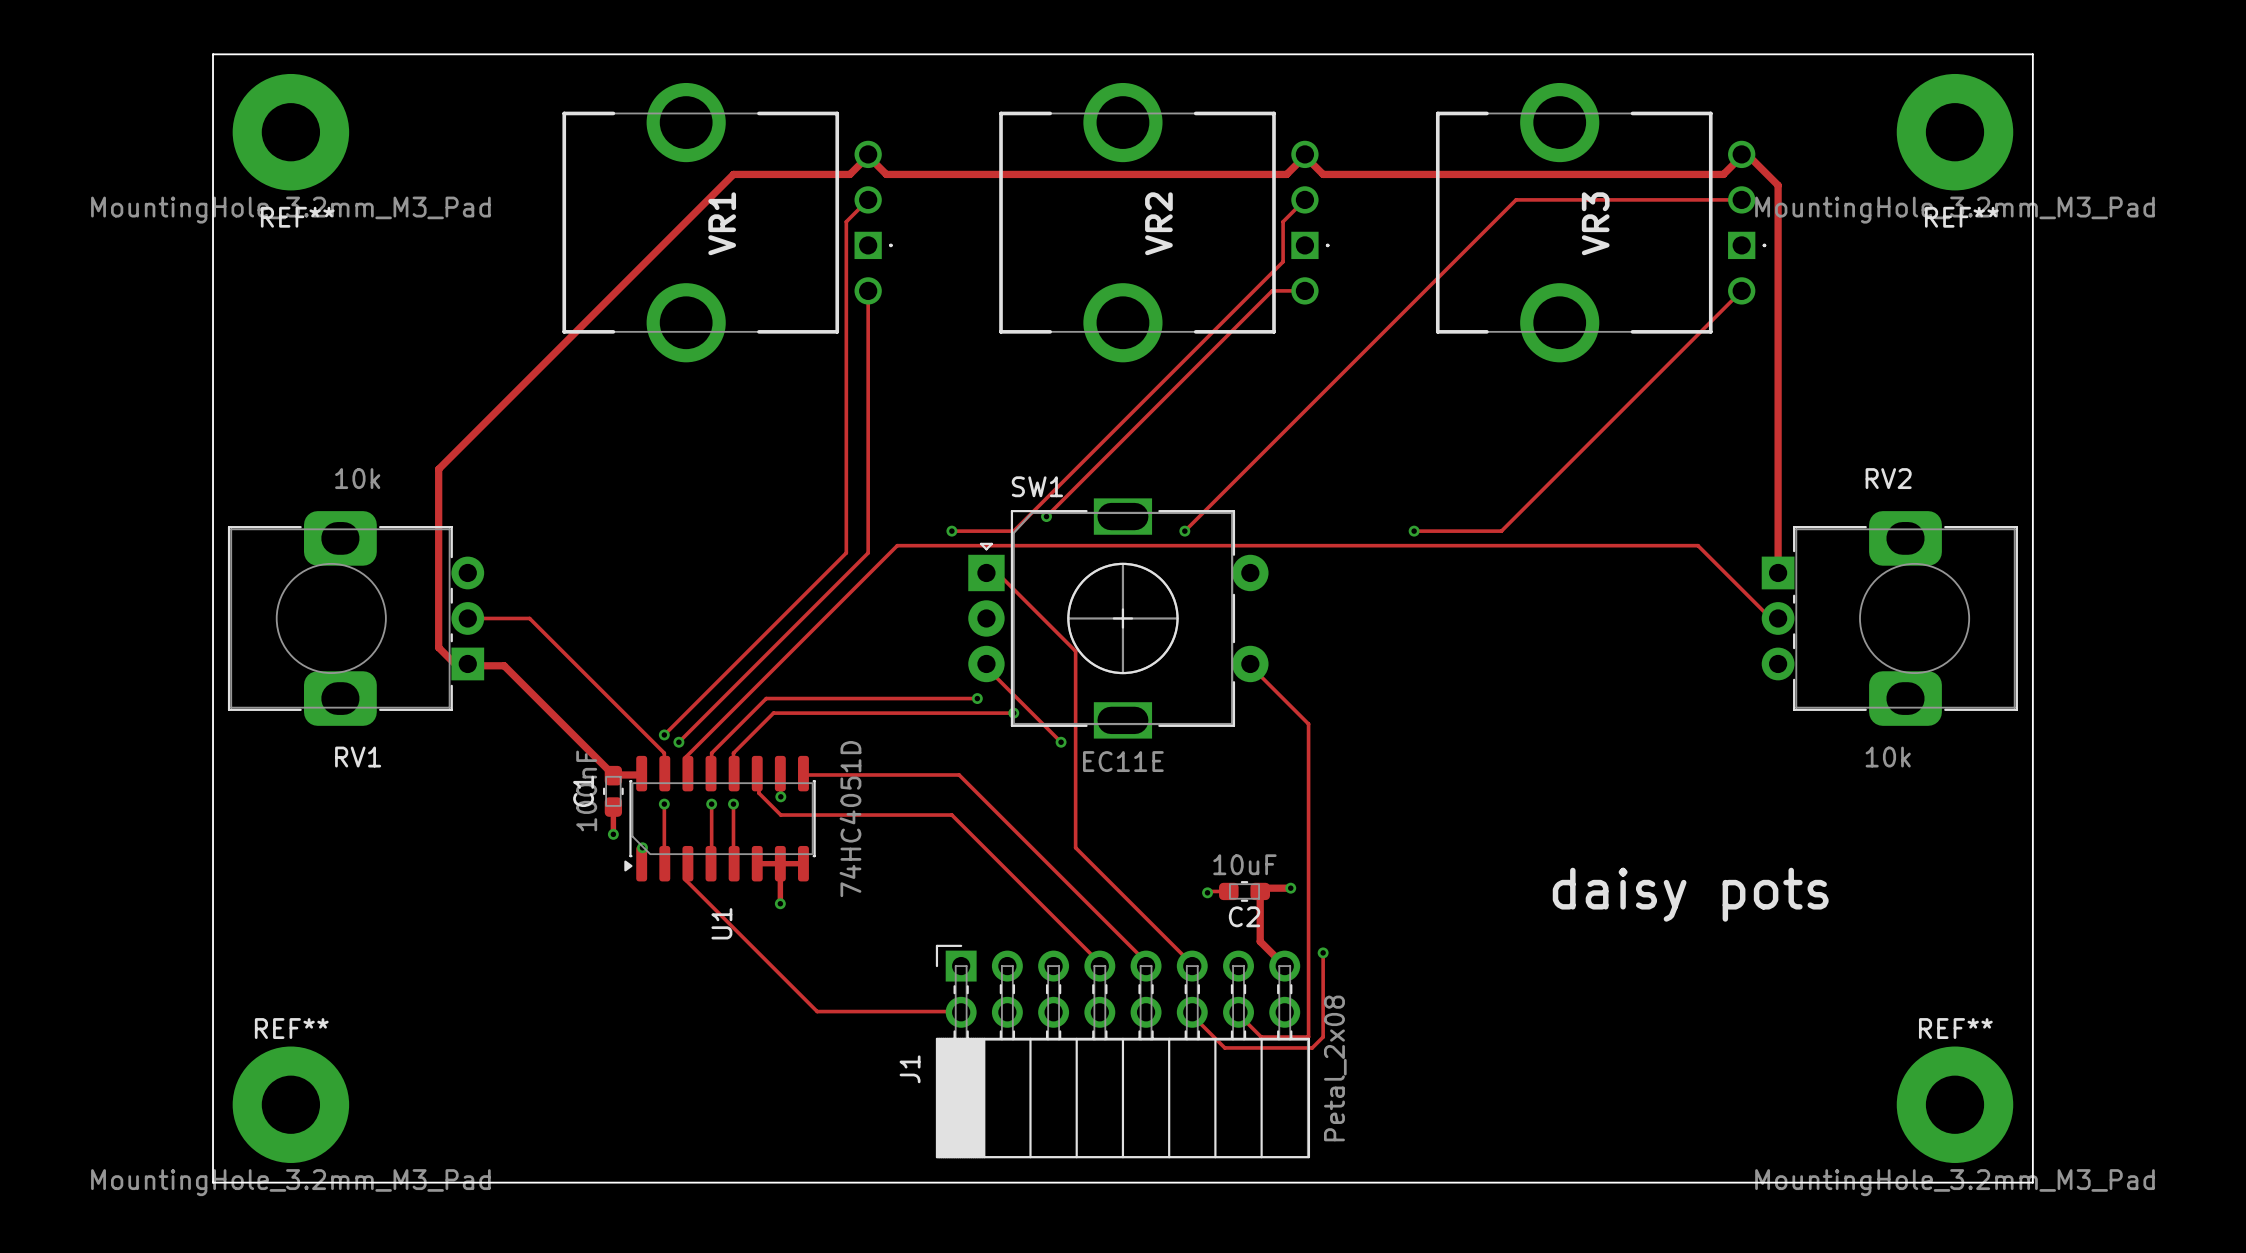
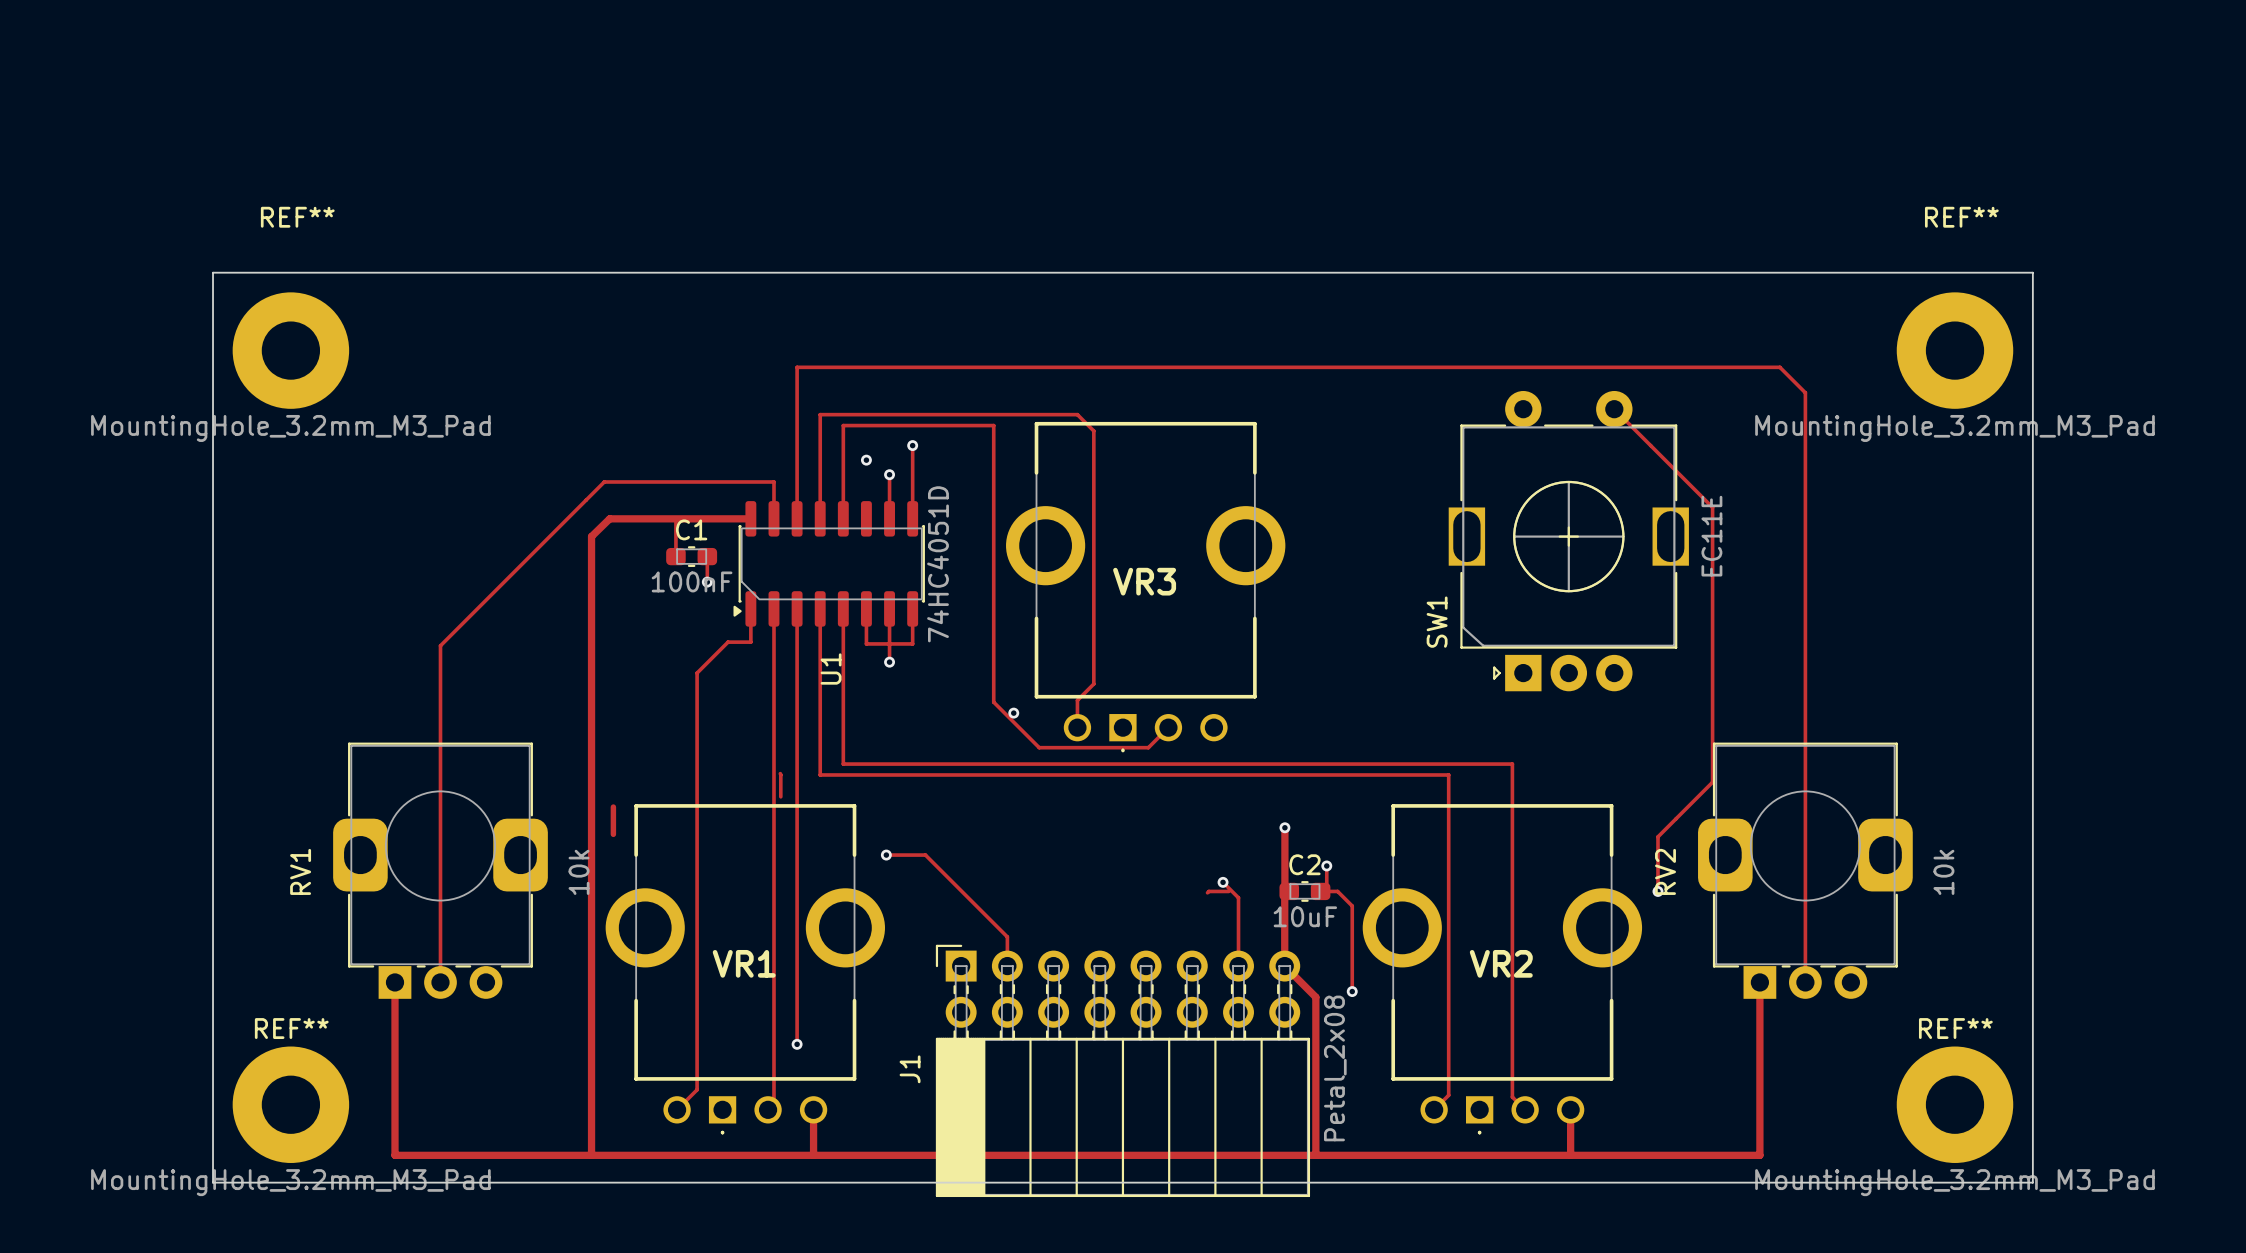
REF** position: (290, 132) -> (290, 350)
REF** position: (1954, 132) -> (1954, 350)
track: (868, 156) (886, 174) (1286, 174) (1304, 156) -> none
track: (868, 156) (849, 174) (733, 174) (438, 469) (438, 647) (456, 665) (504, 665) (613, 774) -> none
track: (1304, 156) (1323, 174) (1723, 174) (1741, 156) -> none
track: (1741, 156) (1748, 156) (1778, 185) (1778, 572) -> none
track: (868, 199) (846, 221) (846, 552) (664, 734) -> none
track: (1304, 199) (1283, 221) (1283, 261) (1013, 531) (951, 531) -> none
track: (1741, 199) (1516, 199) (1184, 531) -> none
VR1 rotation: 0° (727, 222) -> 90° clockwise (745, 969)
VR1 position: (727, 222) -> (745, 969)
VR2 rotation: 0° (1164, 222) -> 90° clockwise (1502, 969)
VR2 position: (1164, 222) -> (1502, 969)
VR3 rotation: 0° (1601, 222) -> 90° clockwise (1145, 587)
VR3 position: (1601, 222) -> (1145, 587)
board edge: (213, 272) (213, 54) (2032, 54) (2032, 272) -> (213, 272) (2032, 272)
track: (868, 290) (868, 552) (678, 742) -> none
track: (1304, 290) (1272, 290) (1046, 516) -> none
track: (1741, 290) (1501, 531) (1414, 531) -> none
track: none -> (1614, 409) (1712, 507) (1712, 782) (1657, 836) (1657, 891)
track: none -> (912, 445) (912, 518)
via: none -> (912, 445)
via: none -> (866, 460)
track: none -> (889, 474) (889, 518)
via: none -> (889, 474)
via: (1046, 516) -> none
track: none -> (675, 518) (675, 556)
track: none -> (750, 518) (609, 518) (591, 536) (591, 1155)
track: none -> (773, 518) (773, 481) (604, 481) (440, 645) (440, 982)
track: none -> (797, 518) (797, 367) (1779, 367) (1805, 392) (1805, 982)
track: none -> (820, 518) (820, 414) (1077, 414) (1093, 431) (1093, 683) (1077, 700) (1077, 727)
track: none -> (843, 518) (843, 425) (993, 425) (993, 702) (1039, 747) (1148, 747) (1168, 727)
via: (951, 531) -> none
via: (1184, 531) -> none
via: (1414, 531) -> none
track: none -> (707, 556) (707, 582)
track: (986, 572) (984, 571) (995, 571) (1075, 651) (1075, 847) (1192, 966) -> none
via: none -> (707, 582)
track: none -> (750, 608) (750, 642) (728, 642) (697, 673) (697, 1089) (677, 1109)
track: none -> (773, 608) (773, 1103) (768, 1109)
track: none -> (797, 608) (797, 1044)
track: none -> (843, 608) (843, 764) (1512, 764) (1512, 1097) (1525, 1109)
track: none -> (866, 608) (866, 643) (912, 643) (912, 608)
track: none -> (889, 608) (889, 662)
RV1 rotation: 0° (356, 618) -> 90° clockwise (440, 870)
RV1 position: (356, 618) -> (440, 870)
track: (467, 618) (529, 618) (664, 753) (664, 773) -> none
SW1 rotation: 0° (1118, 618) -> 90° counterclockwise (1568, 541)
SW1 position: (1118, 618) -> (1568, 541)
track: (1778, 618) (1770, 618) (1698, 545) (897, 545) (686, 756) (686, 774) (687, 773) -> none
RV2 rotation: 0° (1889, 618) -> 90° counterclockwise (1805, 870)
RV2 position: (1889, 618) -> (1805, 870)
via: none -> (889, 662)
track: (986, 663) (984, 665) (1061, 742) -> none
track: (1250, 663) (1308, 724) (1308, 1037) (1261, 1037) (1238, 1012) -> none
track: (977, 698) (766, 698) (711, 753) (711, 774) (711, 773) -> none
via: (977, 698) -> none
track: (1013, 713) (773, 713) (733, 753) (733, 774) (734, 773) -> none
via: (664, 734) -> none
via: (678, 742) -> none
via: (1061, 742) -> none
track: (641, 773) (642, 774) (613, 774) -> none
track: (757, 773) (758, 774) (758, 793) (780, 815) (951, 815) (1101, 964) (1099, 966) -> none
track: (803, 773) (802, 774) (820, 774) -> (820, 608) (820, 774)
track: (959, 774) (1144, 960) (1146, 966) -> (959, 774) (1448, 774) (1448, 1095) (1434, 1109)
C1 value position: 100nF (586, 790) -> 100nF (692, 581)
C1 rotation: 0° (613, 791) -> 90° clockwise (691, 556)
C1 position: (613, 791) -> (691, 556)
via: (780, 796) -> none
track: (664, 804) (664, 863) -> none
via: (664, 804) -> none
track: (711, 804) (711, 863) -> none
via: (711, 804) -> none
track: (733, 804) (734, 863) -> none
via: (733, 804) -> none
U1 position: (720, 818) -> (829, 563)
U1 value position: 74HC4051D (850, 819) -> 74HC4051D (938, 564)
track: none -> (1284, 827) (1284, 887) (1289, 891) (1284, 896) (1284, 966) (1315, 997) (1315, 1155)
via: none -> (1284, 827)
via: (613, 834) -> none
via: (642, 847) -> none
track: none -> (886, 855) (925, 855) (1007, 936) (1007, 966)
via: none -> (886, 855)
track: (687, 863) (686, 862) (686, 880) (817, 1011) (962, 1011) (961, 1012) -> none
track: (757, 863) (803, 863) -> none
track: (780, 863) (780, 903) -> none
C2 value position: 10uF (1244, 864) -> 10uF (1305, 916)
track: none -> (1326, 865) (1326, 885) (1320, 891) (1337, 891) (1352, 906) (1352, 991)
via: none -> (1326, 865)
track: none -> (1223, 882) (1238, 897) (1238, 966)
track: (1290, 888) (1263, 888) (1260, 891) (1260, 941) (1284, 966) (1283, 964) -> none
via: (1290, 888) -> none
C2 position: (1244, 891) -> (1304, 891)
via: none -> (1657, 891)
via position: (1207, 892) -> (1223, 882)
text: daisy pots (1690, 894) -> none
via: (780, 903) -> none
C2 name position: C2 (1244, 916) -> C2 (1304, 864)
J1 footprint: [935, 944, 1311, 1159] -> [935, 944, 1311, 1198]
track: (1323, 952) (1323, 1037) (1312, 1047) (1224, 1047) (1192, 1015) (1192, 1012) -> none
via: (1323, 952) -> none
track: none -> (394, 982) (394, 1155) (1759, 1155) (1759, 982)
via: none -> (1352, 991)
via: none -> (797, 1044)
track: none -> (813, 1109) (813, 1155)
track: none -> (1570, 1109) (1570, 1155)

